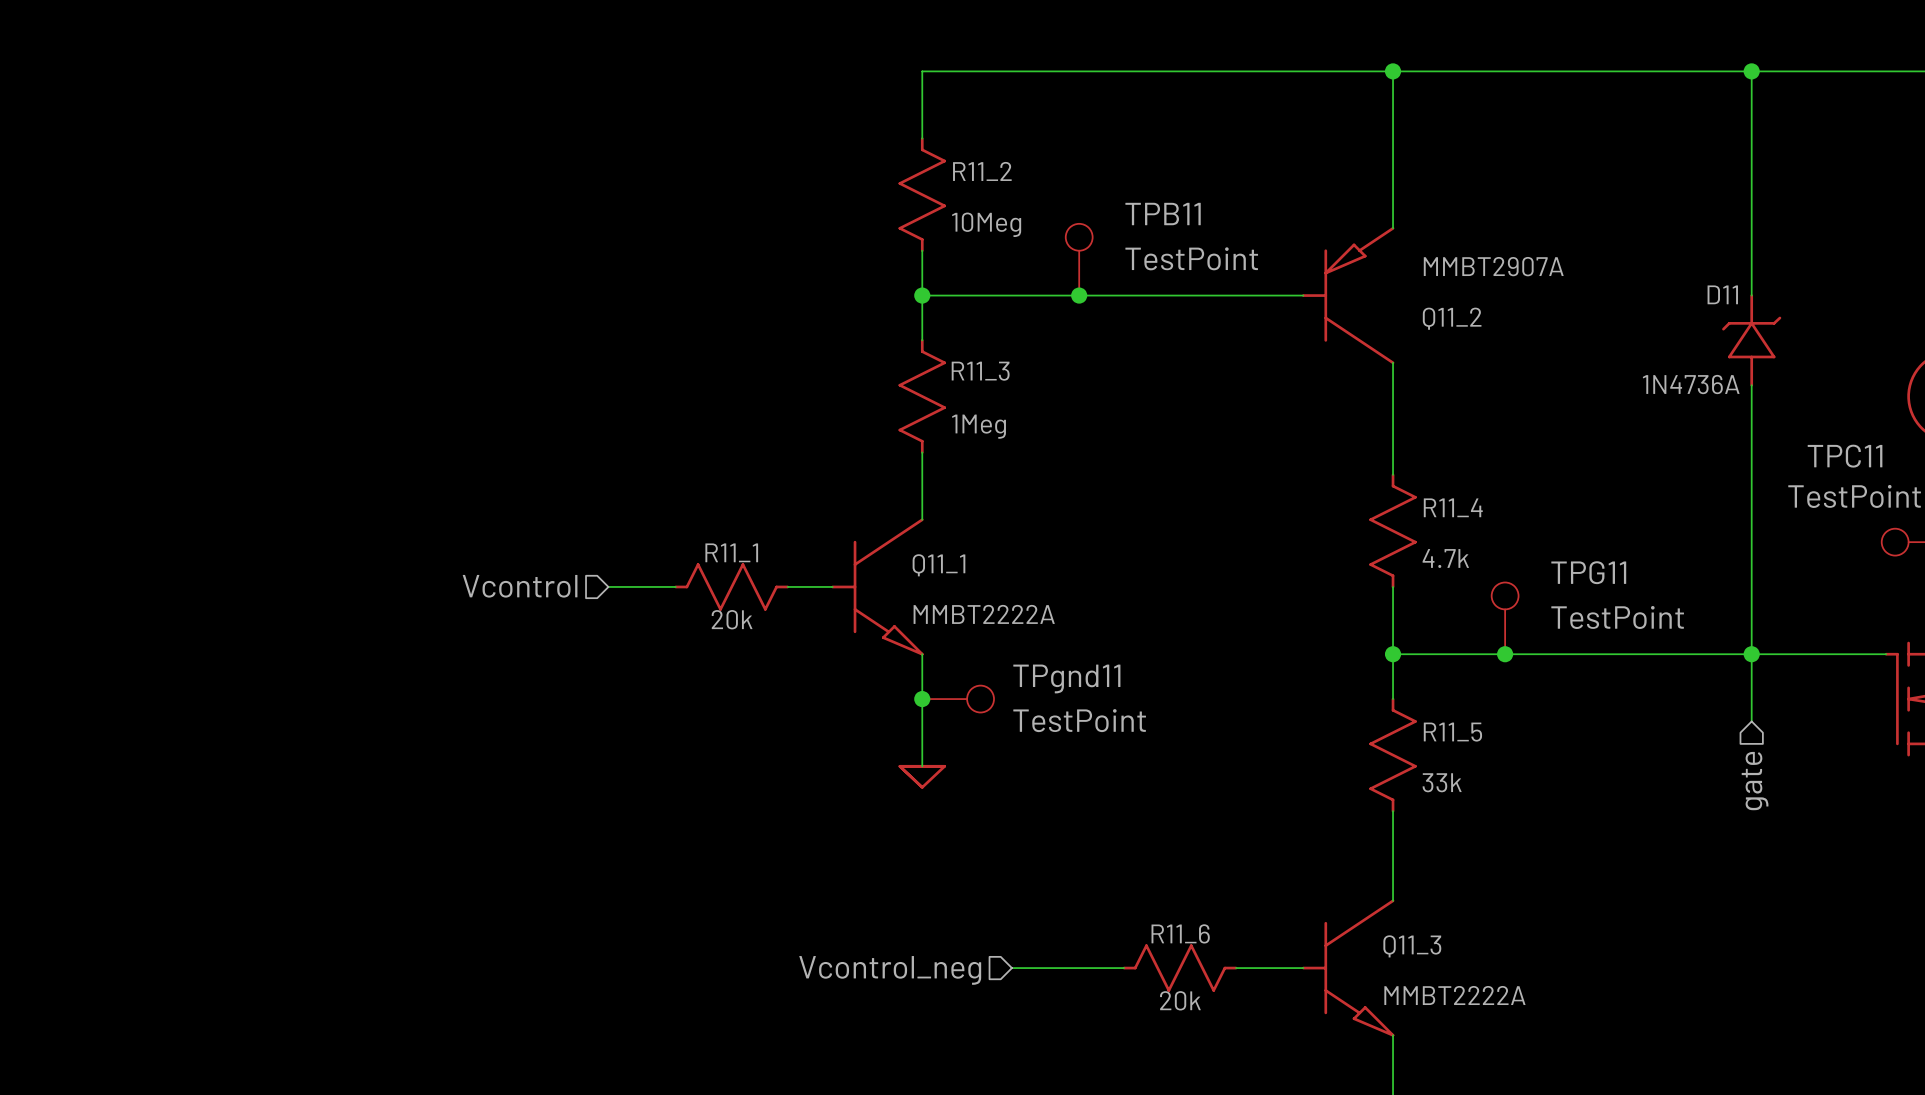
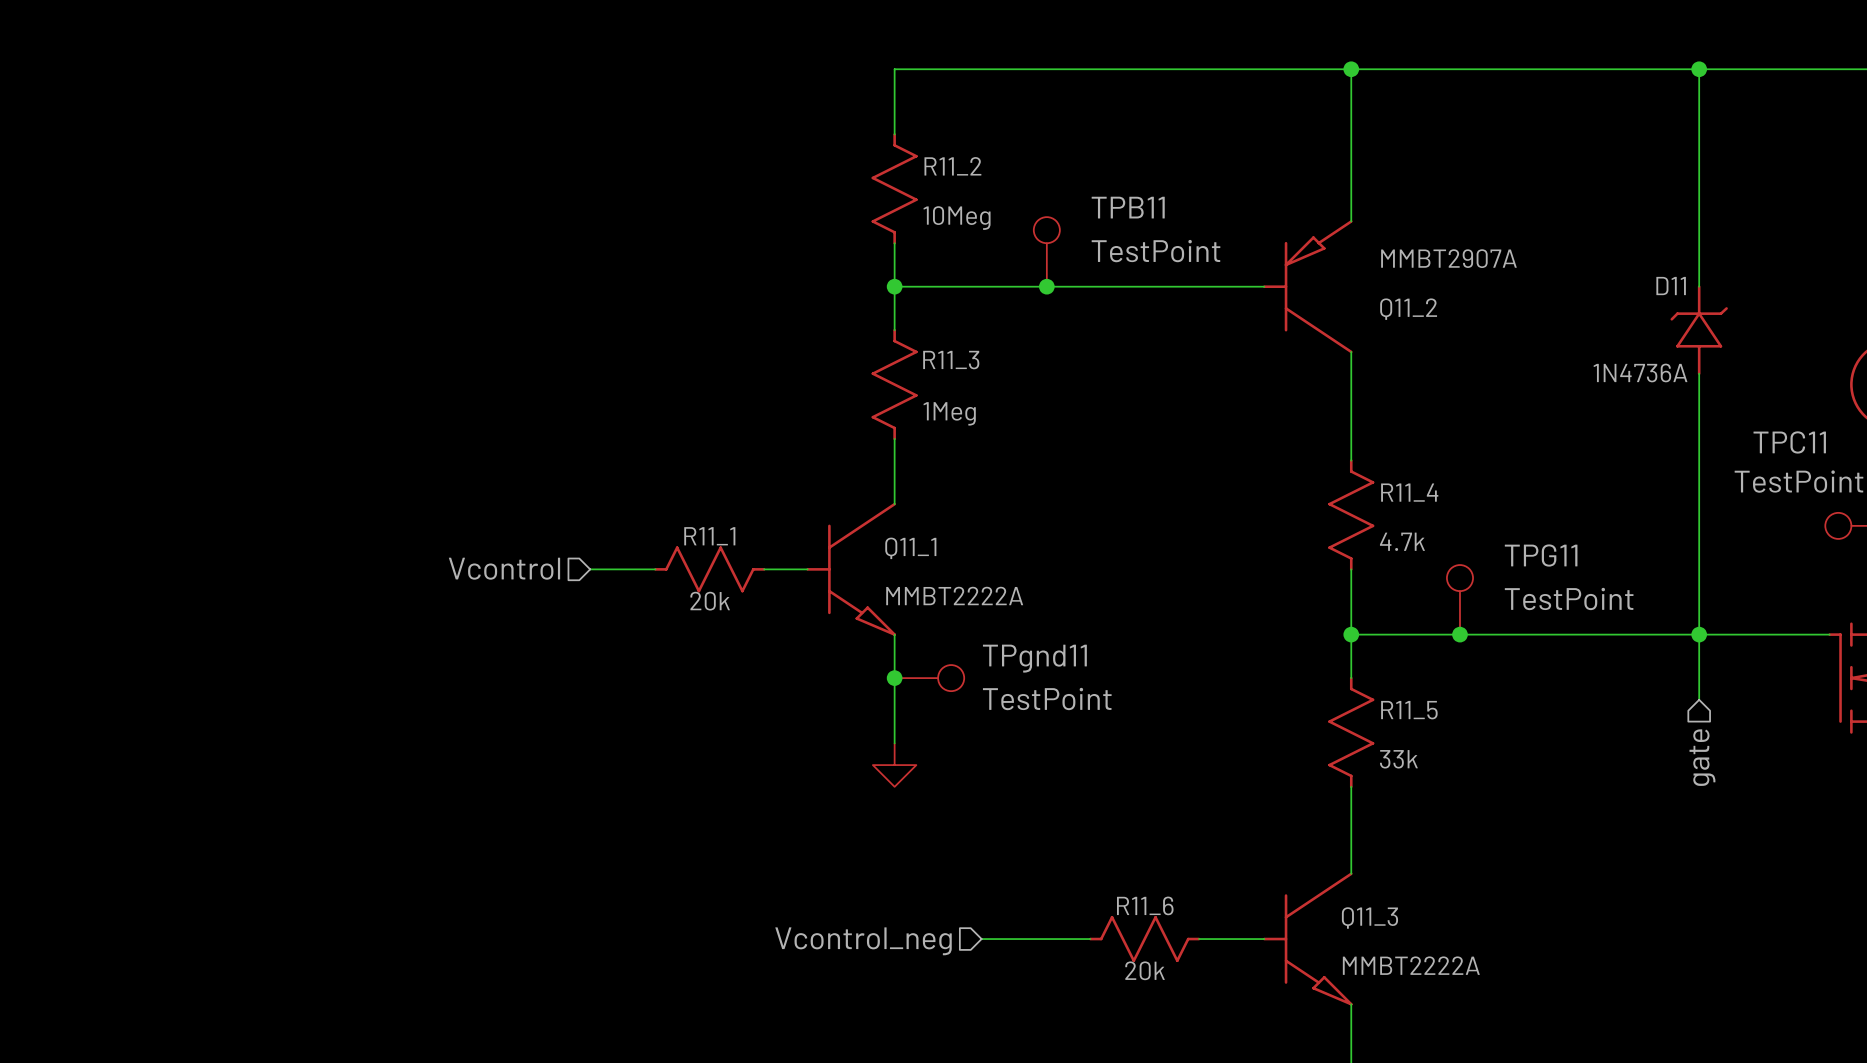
power symbol shape: [898, 764, 947, 789] -> [872, 743, 917, 787]

